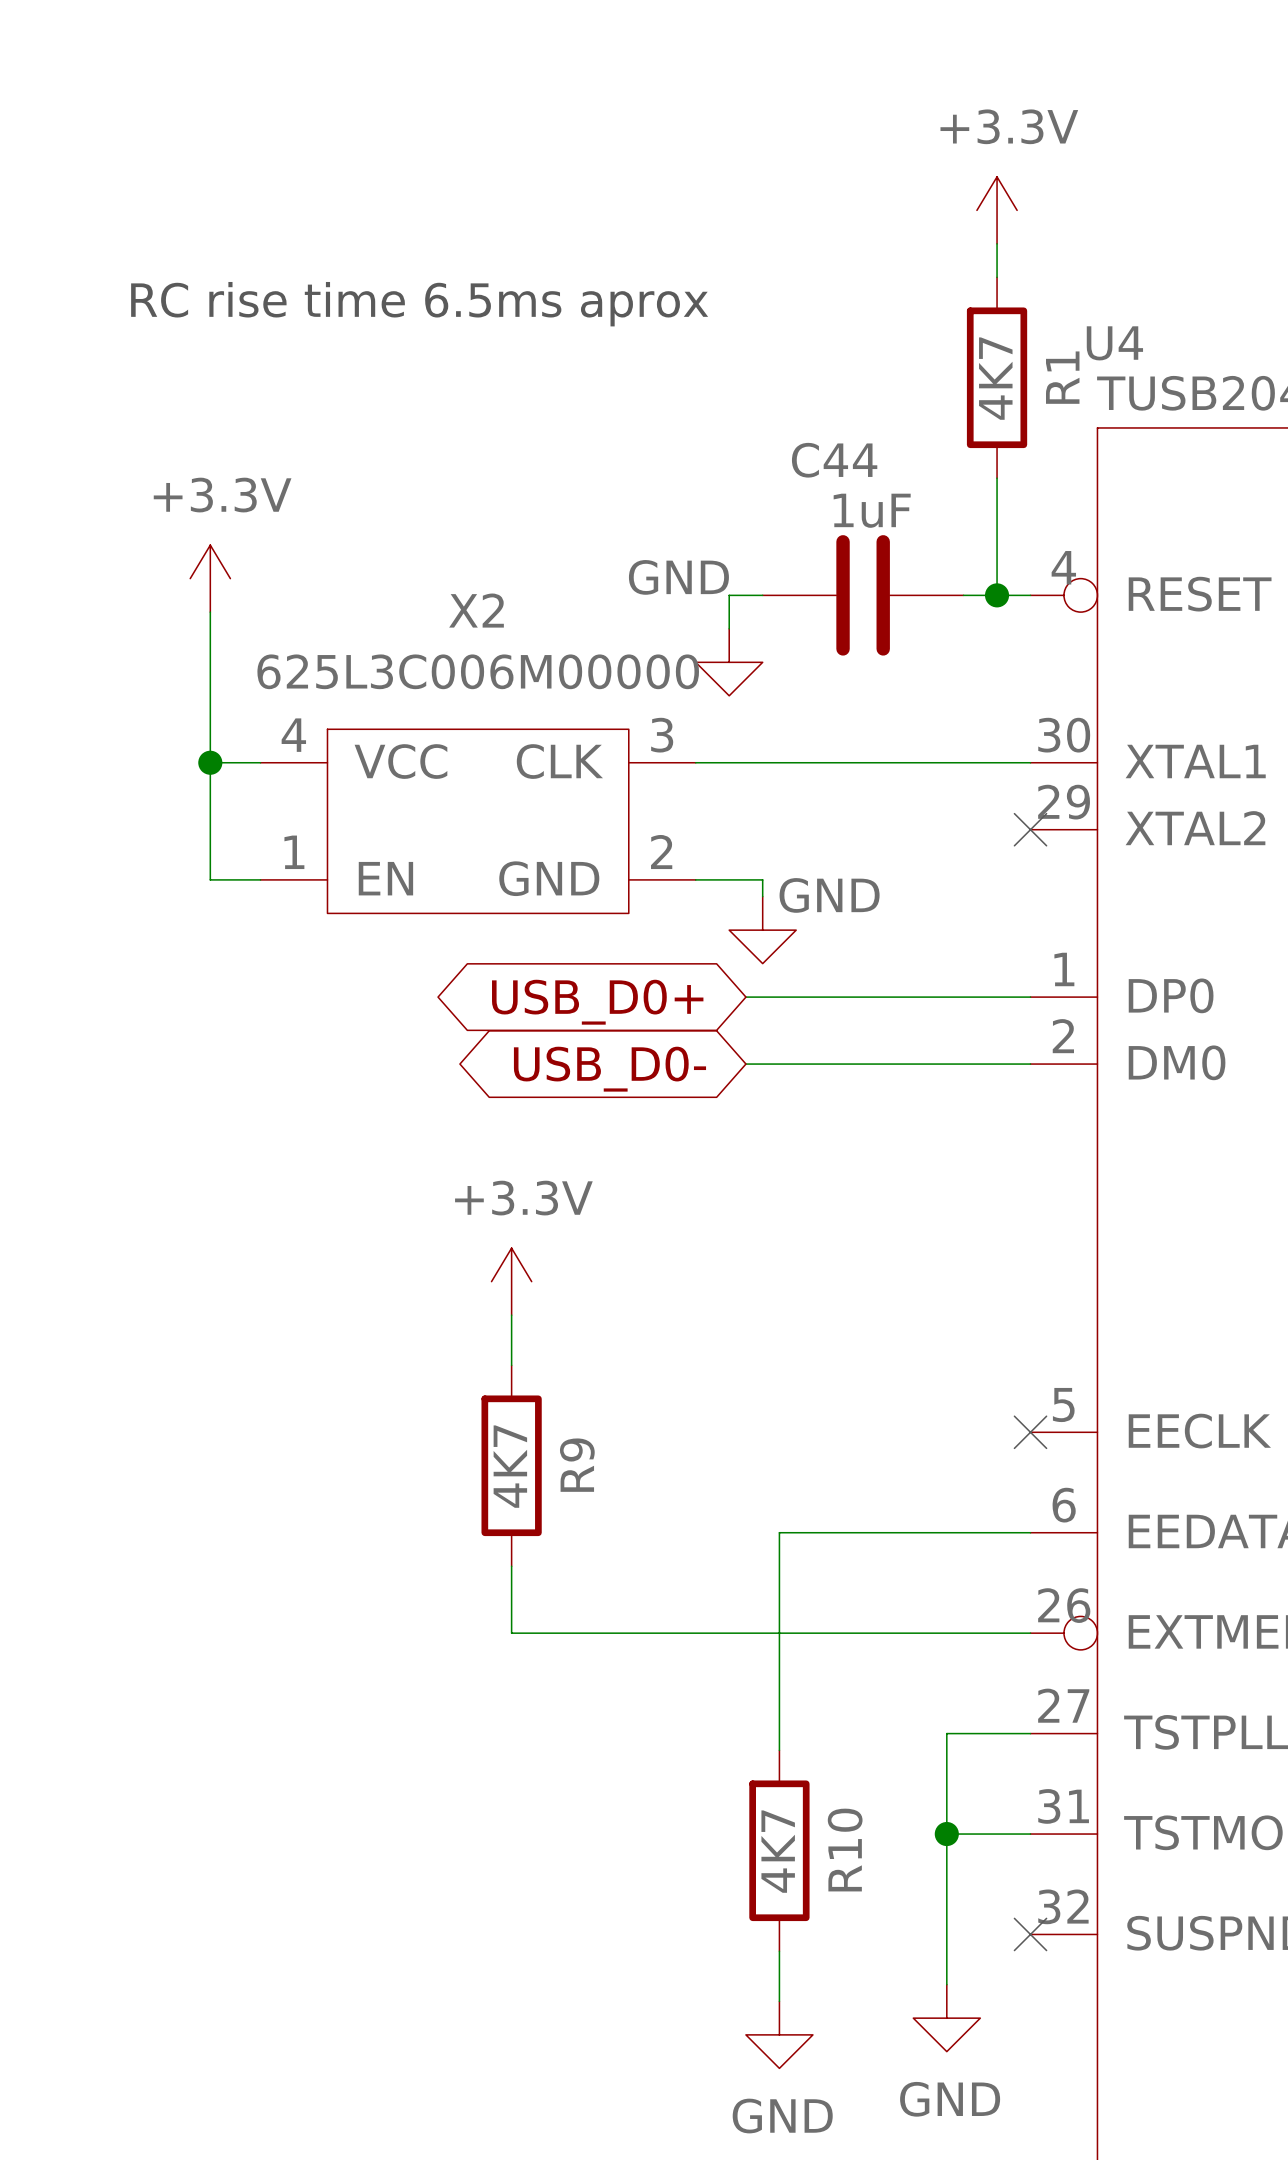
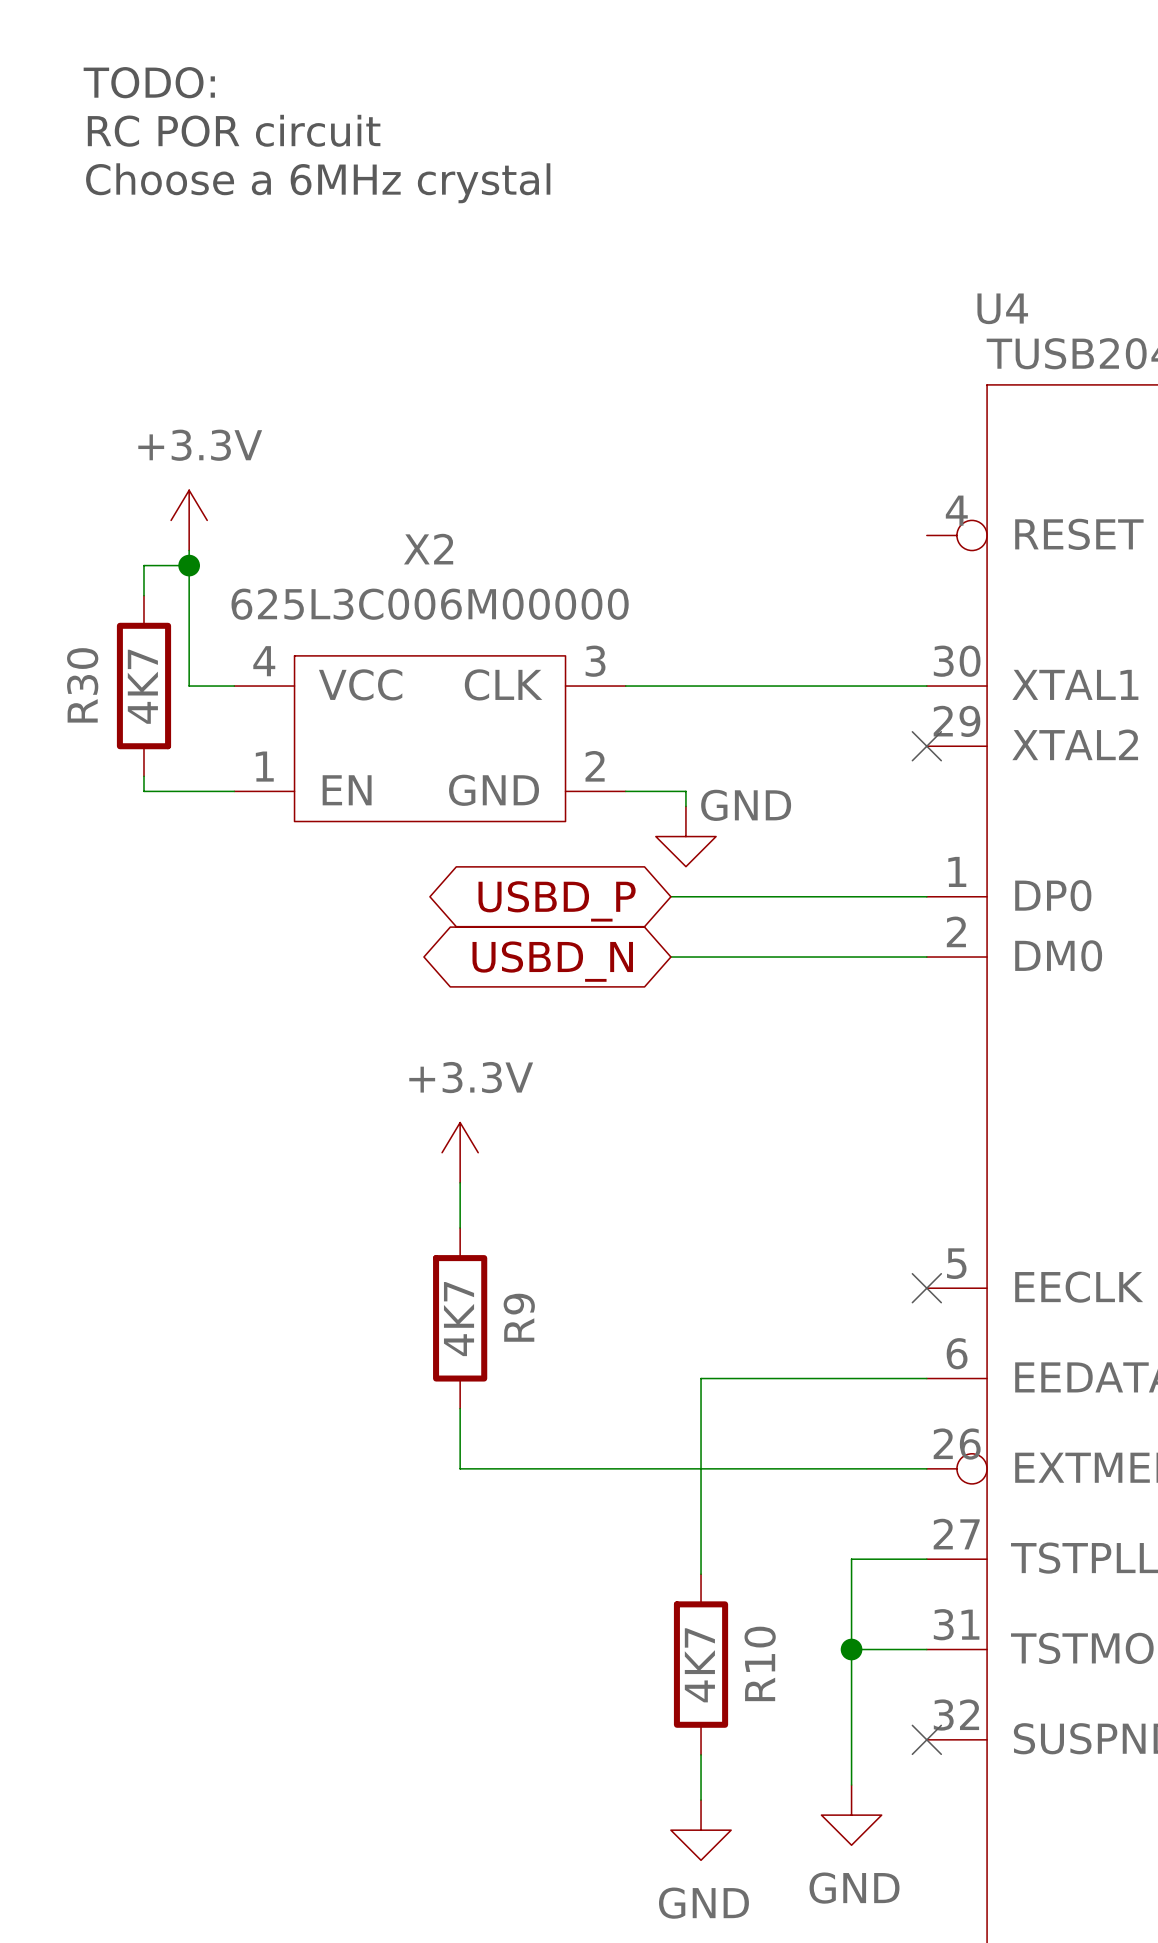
text: none -> TODO: (149, 82)
text: none -> RC POR circuit (234, 130)
text: none -> Choose a 6MHz crystal (318, 183)
power symbol: +3.3V (997, 210) -> none
wire: (997, 243) (997, 277) -> none
text: RC rise time 6.5ms aprox (419, 304) -> none
R1: 4K7 (997, 377) -> none
wire: (997, 478) (997, 595) -> none
wire: (762, 595) (729, 595) (729, 628) -> none
C44: 1uF (863, 595) -> none
wire: (963, 595) (1030, 595) -> none
junction: (997, 595) -> none
wire: none -> (189, 565) (143, 565) (143, 595)
power symbol: GND (729, 662) -> none
R30: none -> 4K7 (143, 686)
wire: (210, 762) (210, 879) -> (143, 776) (143, 791) (189, 791)
junction position: (210, 762) -> (189, 565)
global label: USB_D0+ (597, 1002) -> USBD_P (557, 901)
global label: USB_D0- (609, 1069) -> USBD_N (552, 961)

